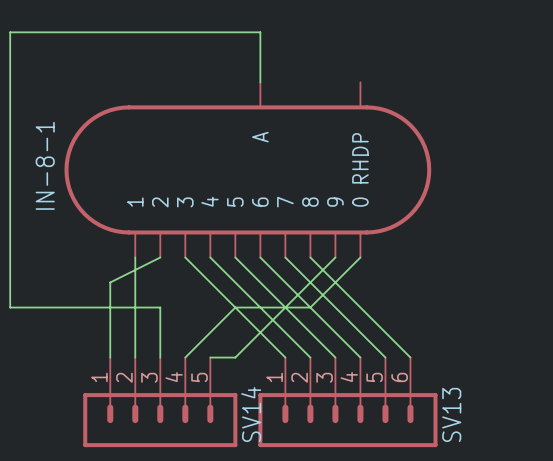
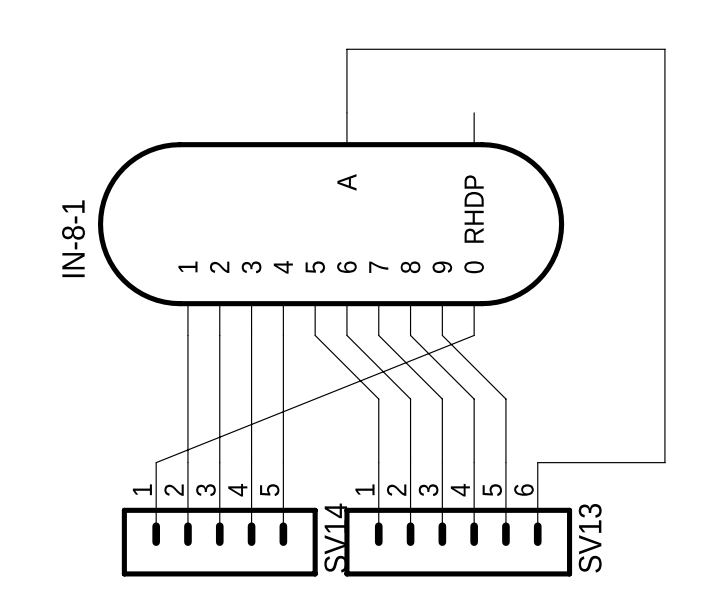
wire: (260, 32) (10, 32) (10, 307) (160, 307) -> (346, 49) (664, 49) (664, 462) (537, 462)
wire: (160, 257) (110, 282) (110, 357) -> (219, 335) (219, 399)
wire: (185, 257) (285, 357) -> (251, 335) (251, 462)
wire: (210, 257) (310, 357) -> (283, 335) (283, 462)
wire: (335, 257) (235, 357) (210, 357) -> (442, 335) (505, 399) (505, 462)
wire: (360, 257) (310, 307) -> (474, 335) (156, 462)
wire: (285, 307) (335, 357) -> (378, 399) (378, 462)
wire: (310, 307) (360, 357) -> (410, 399) (410, 462)
wire: (310, 307) (235, 307) (185, 357) -> none
wire: (335, 307) (385, 357) -> (442, 399) (442, 462)
wire: (360, 307) (410, 357) -> (474, 399) (474, 462)

